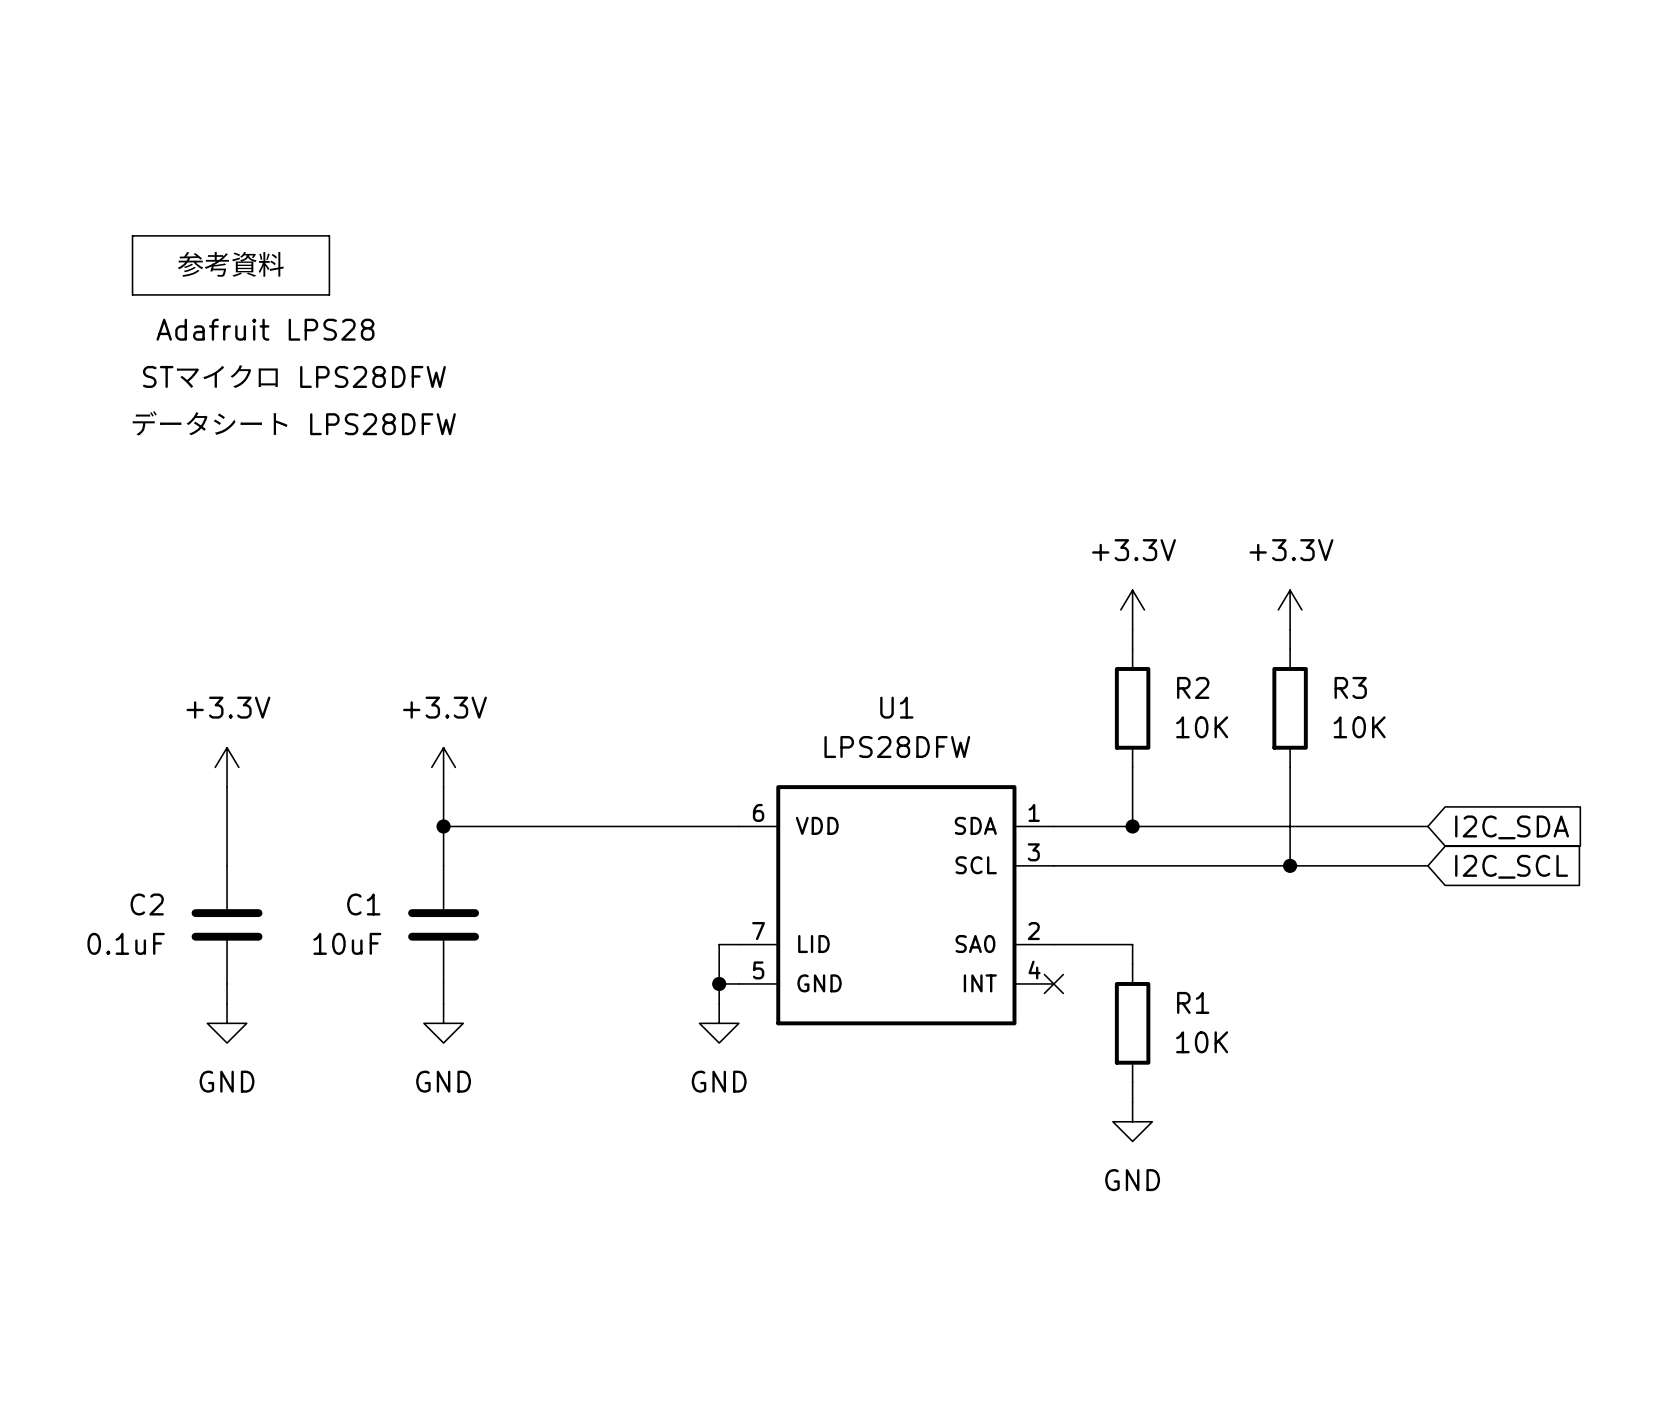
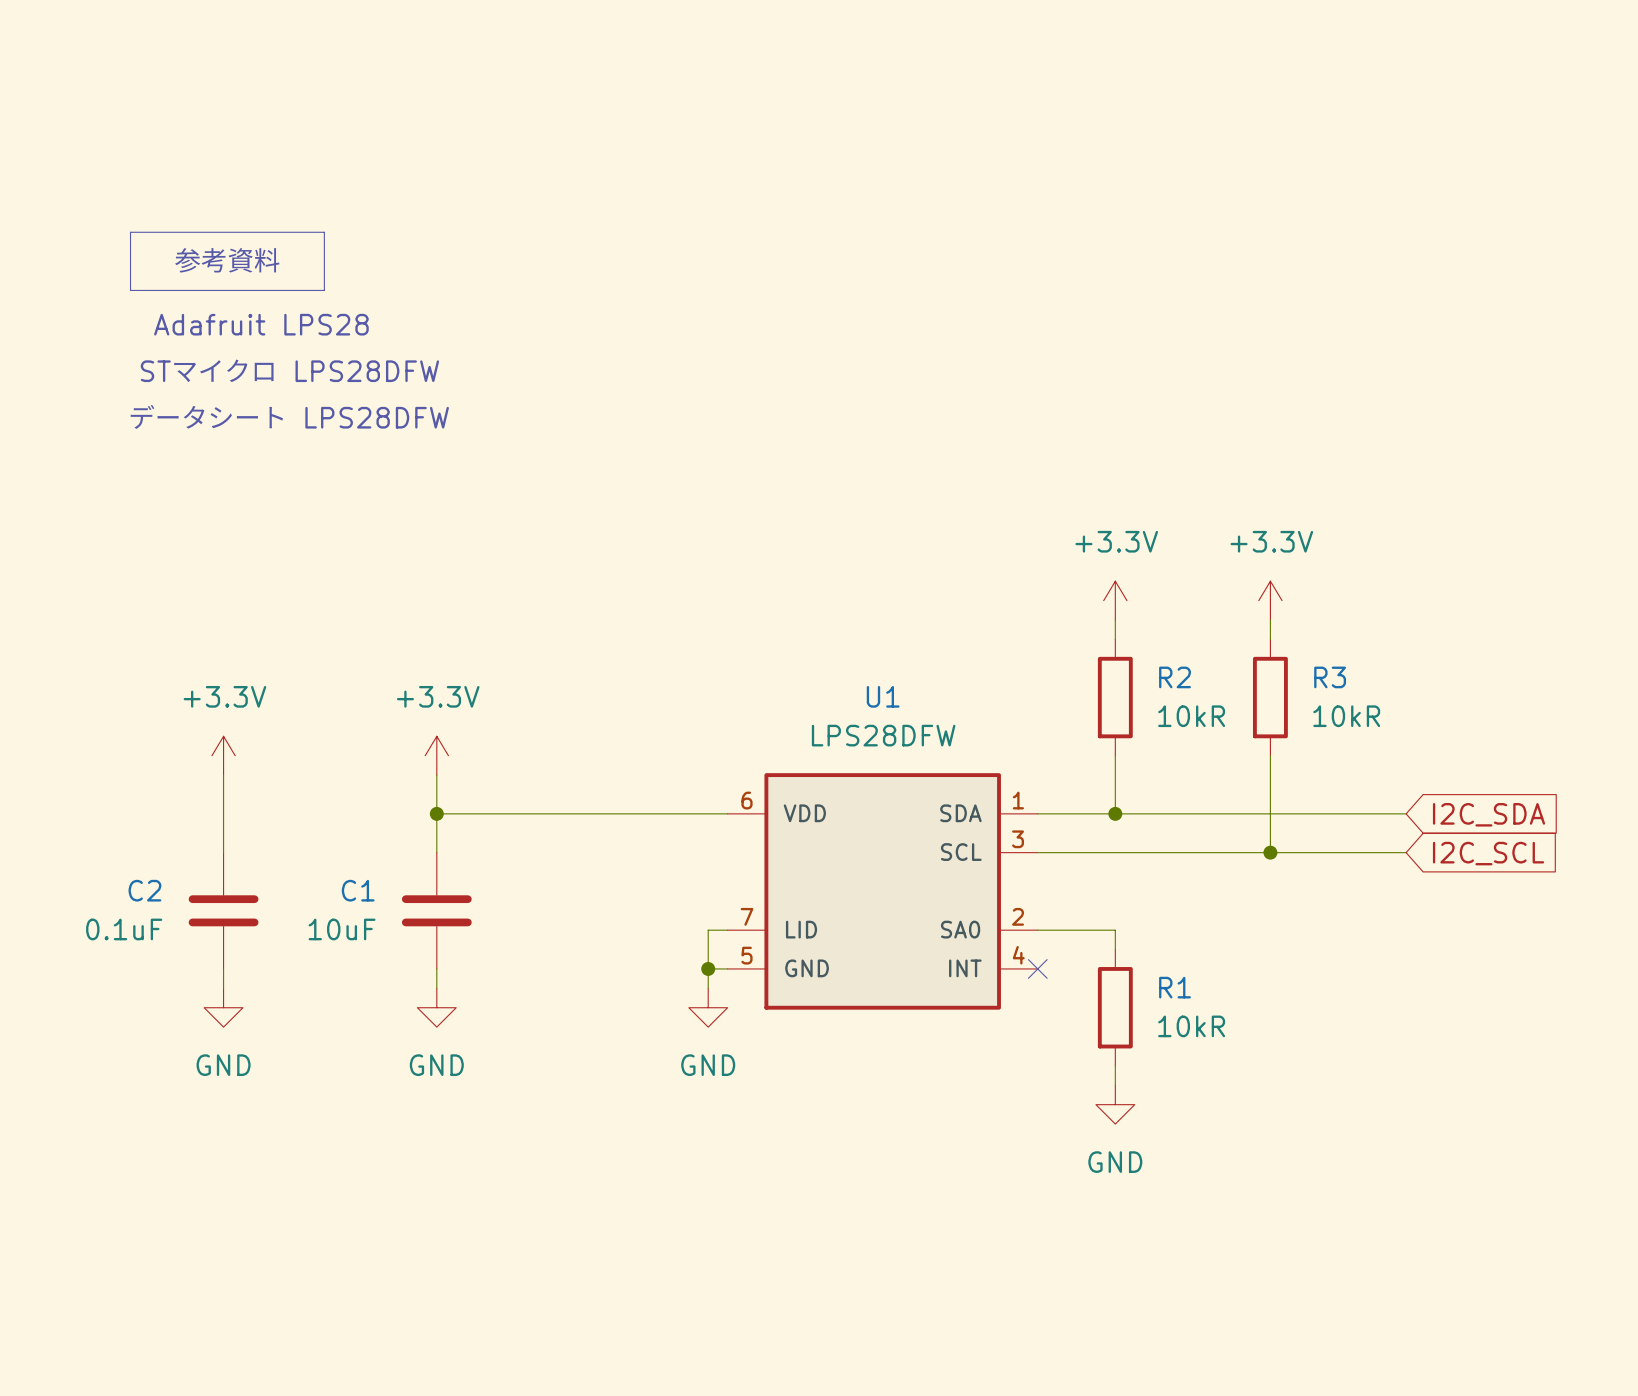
R2 value: 10K (1202, 727) -> 10kR (1191, 716)
R3 value: 10K (1359, 727) -> 10kR (1346, 716)
R1 value: 10K (1202, 1042) -> 10kR (1191, 1026)

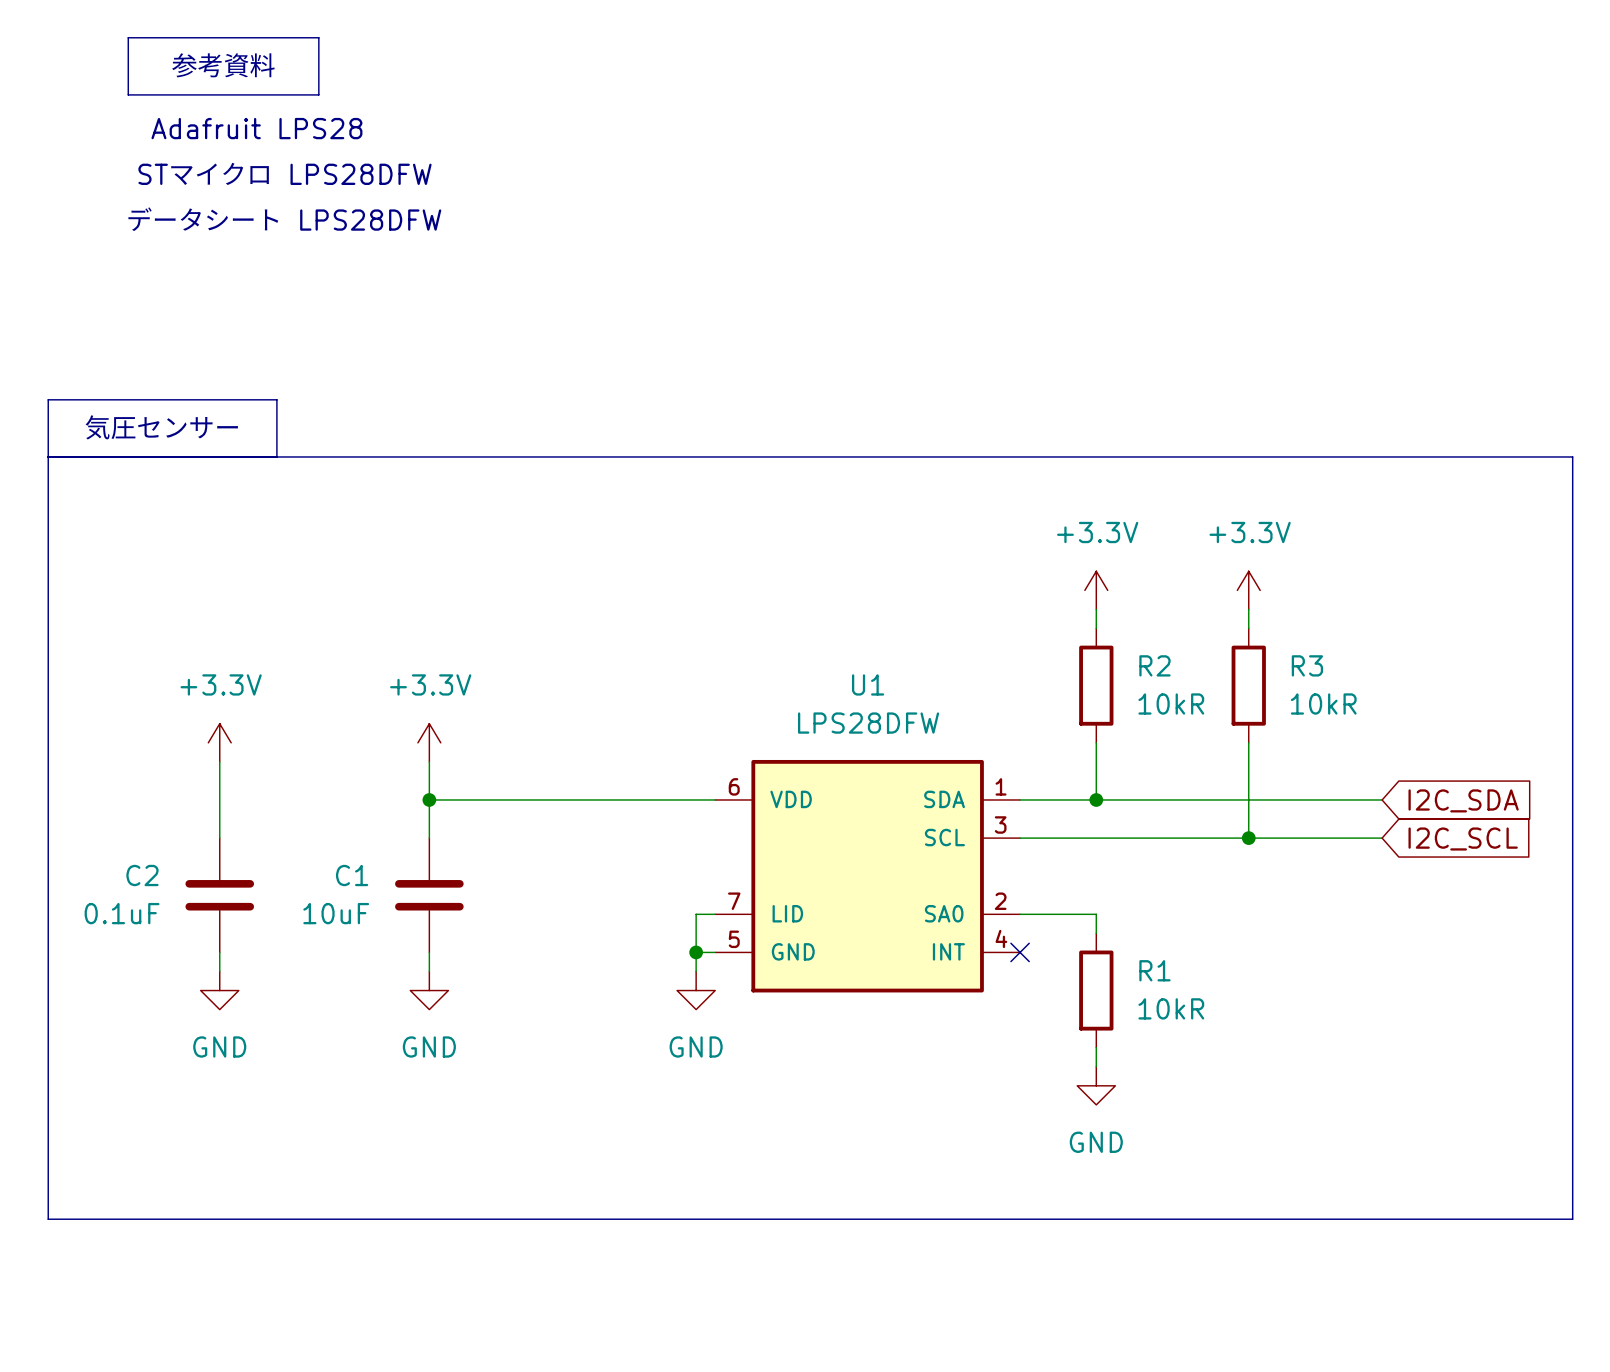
line: (130, 232) (324, 232) (324, 290) (130, 290) (130, 232) -> (128, 37) (318, 37) (318, 94) (128, 94) (128, 37)
text position: 参考資料 (227, 260) -> 参考資料 (223, 65)
text position: Adafruit LPS28 (261, 324) -> Adafruit LPS28 (256, 128)
text position: STマイクロ LPS28DFW (289, 370) -> STマイクロ LPS28DFW (284, 173)
text position: データシート LPS28DFW (289, 416) -> データシート LPS28DFW (284, 219)
text: none -> 気圧センサー (161, 427)
line: none -> (48, 456) (1572, 456) (1572, 1219) (48, 1219) (48, 399) (276, 399) (276, 456)

